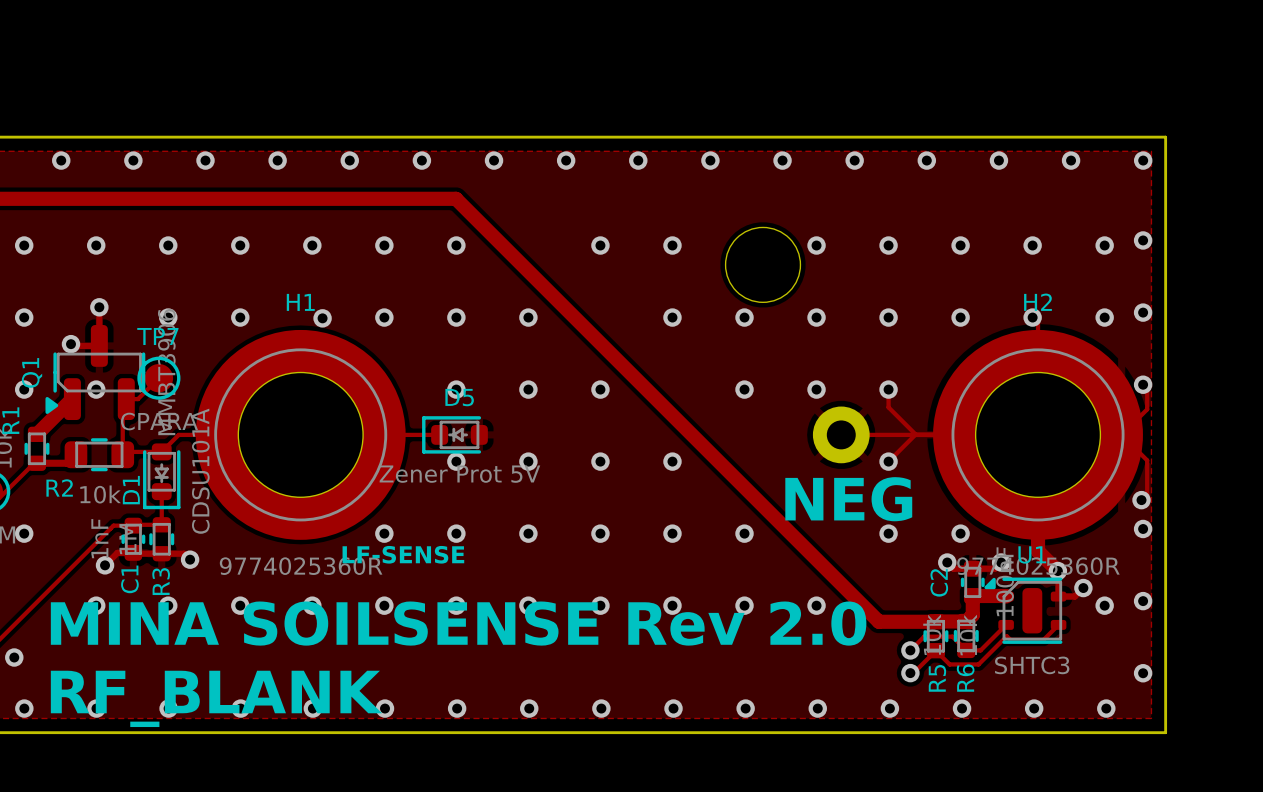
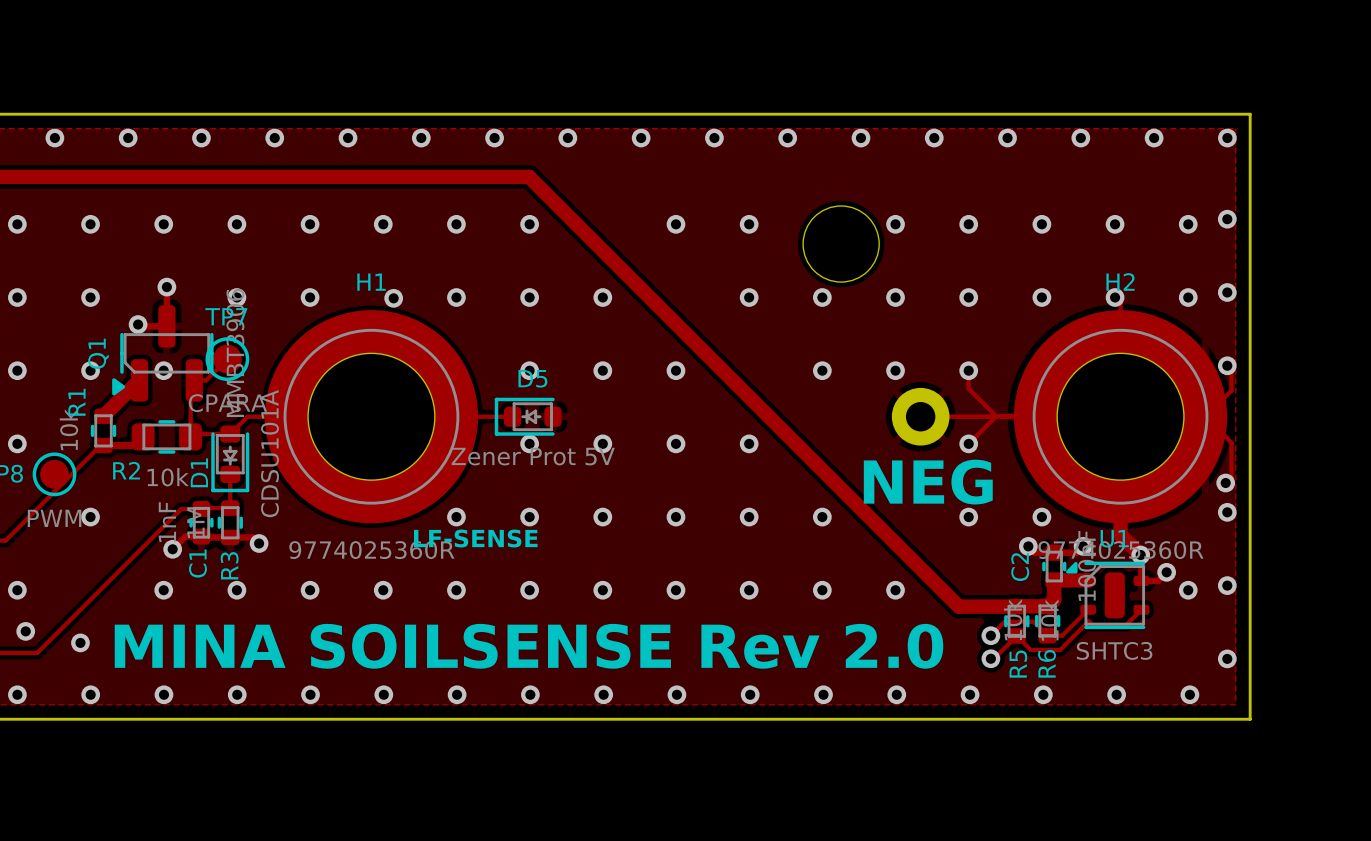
text position: MINA SOILSENSE Rev 2.0 (458, 623) -> MINA SOILSENSE Rev 2.0 (528, 646)
text: RF_BLANK (216, 698) -> none

